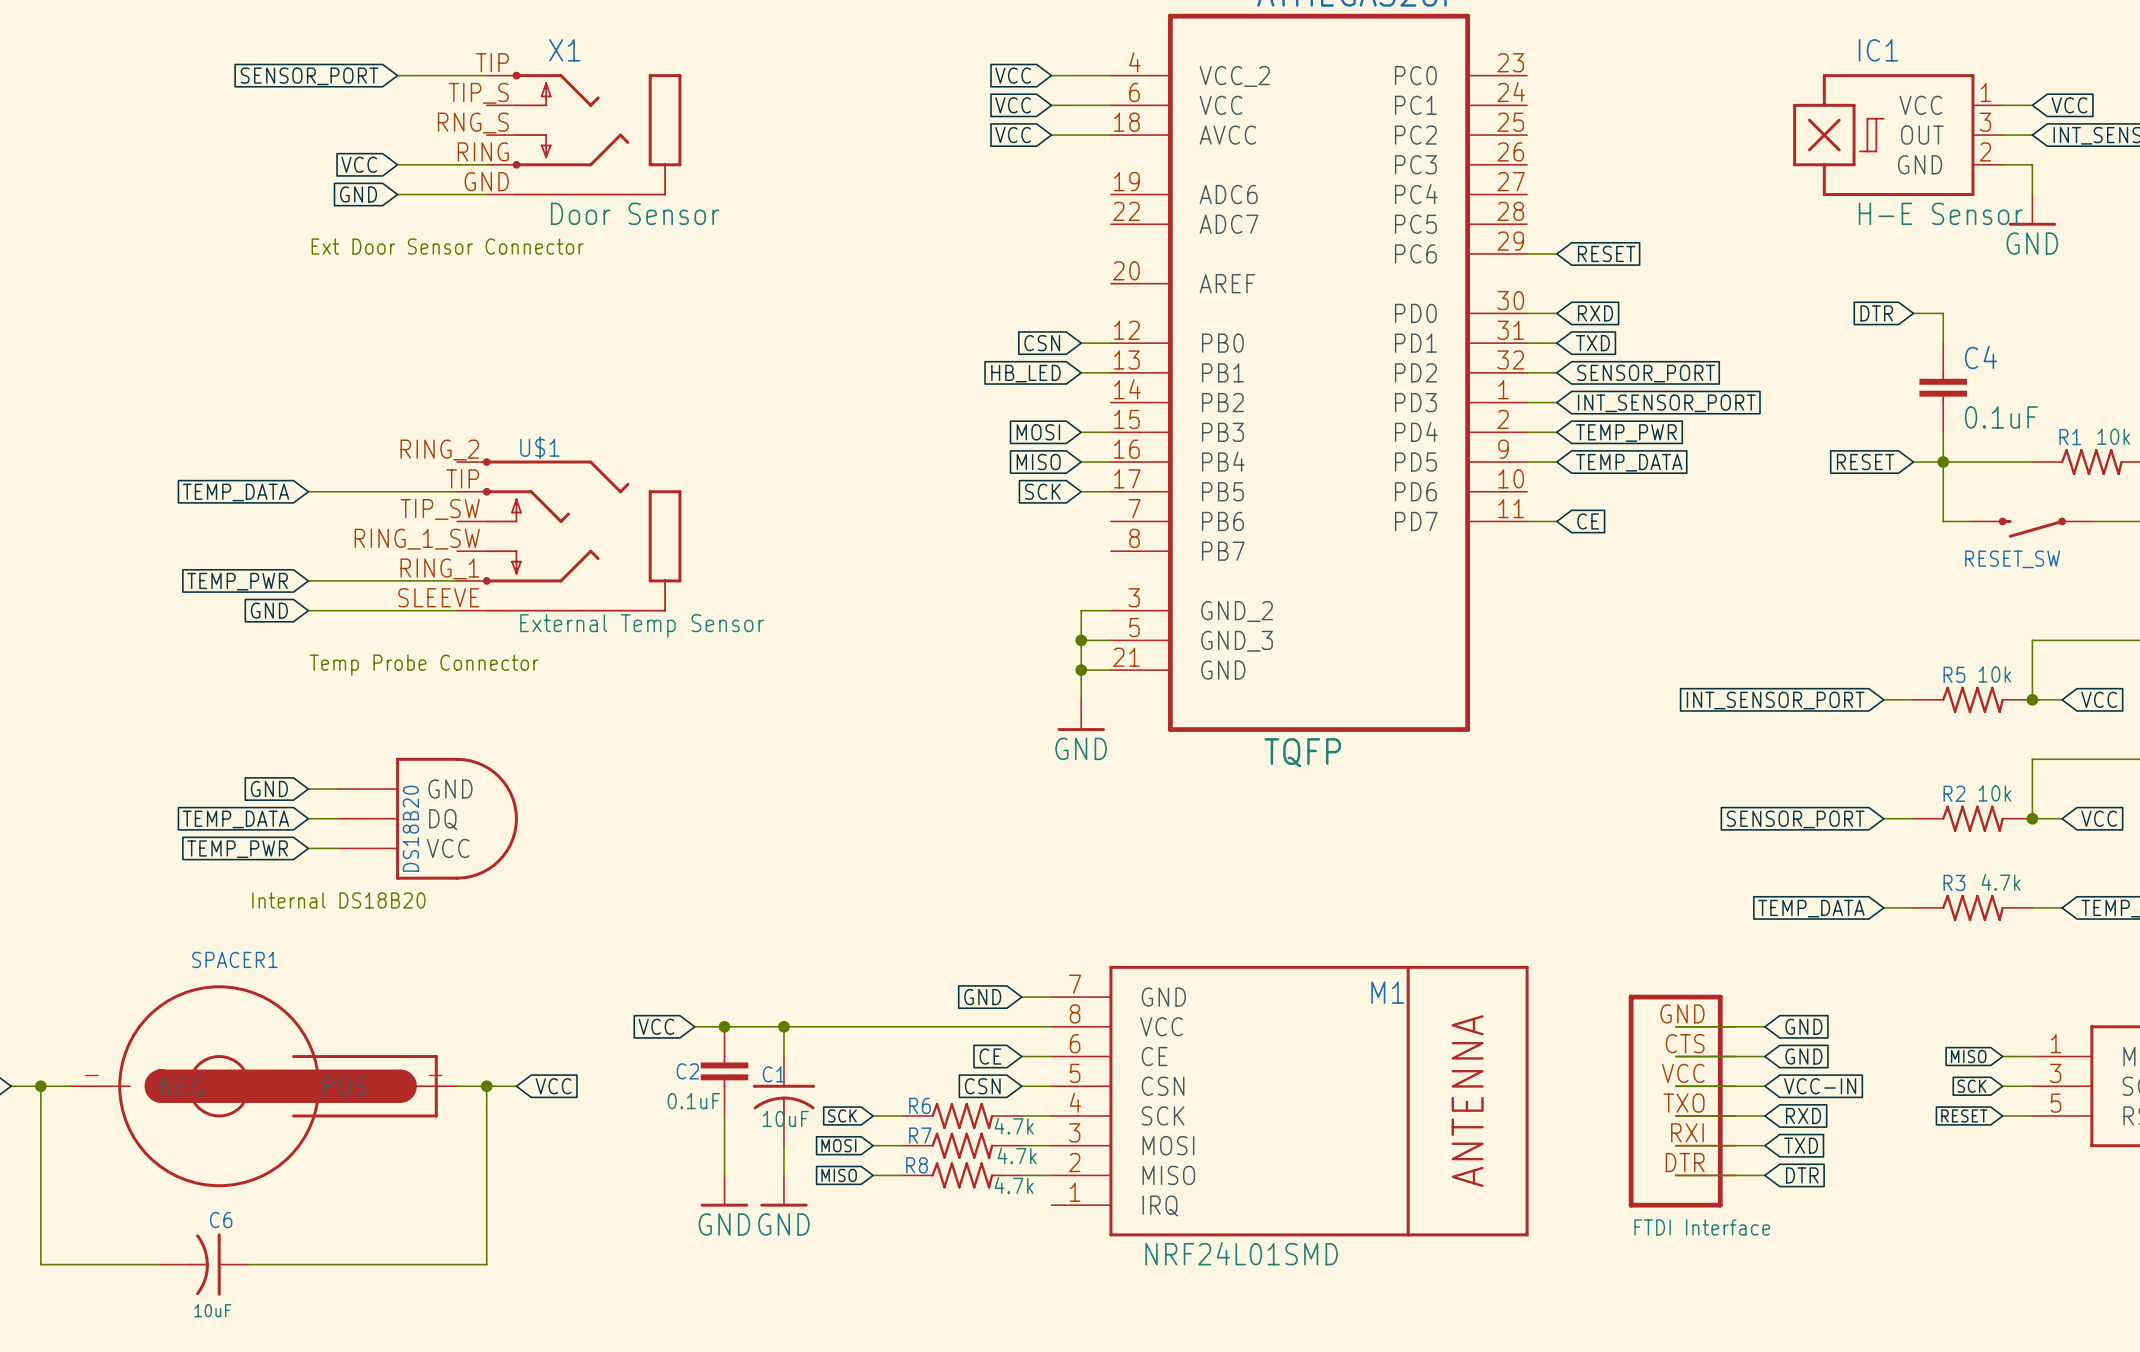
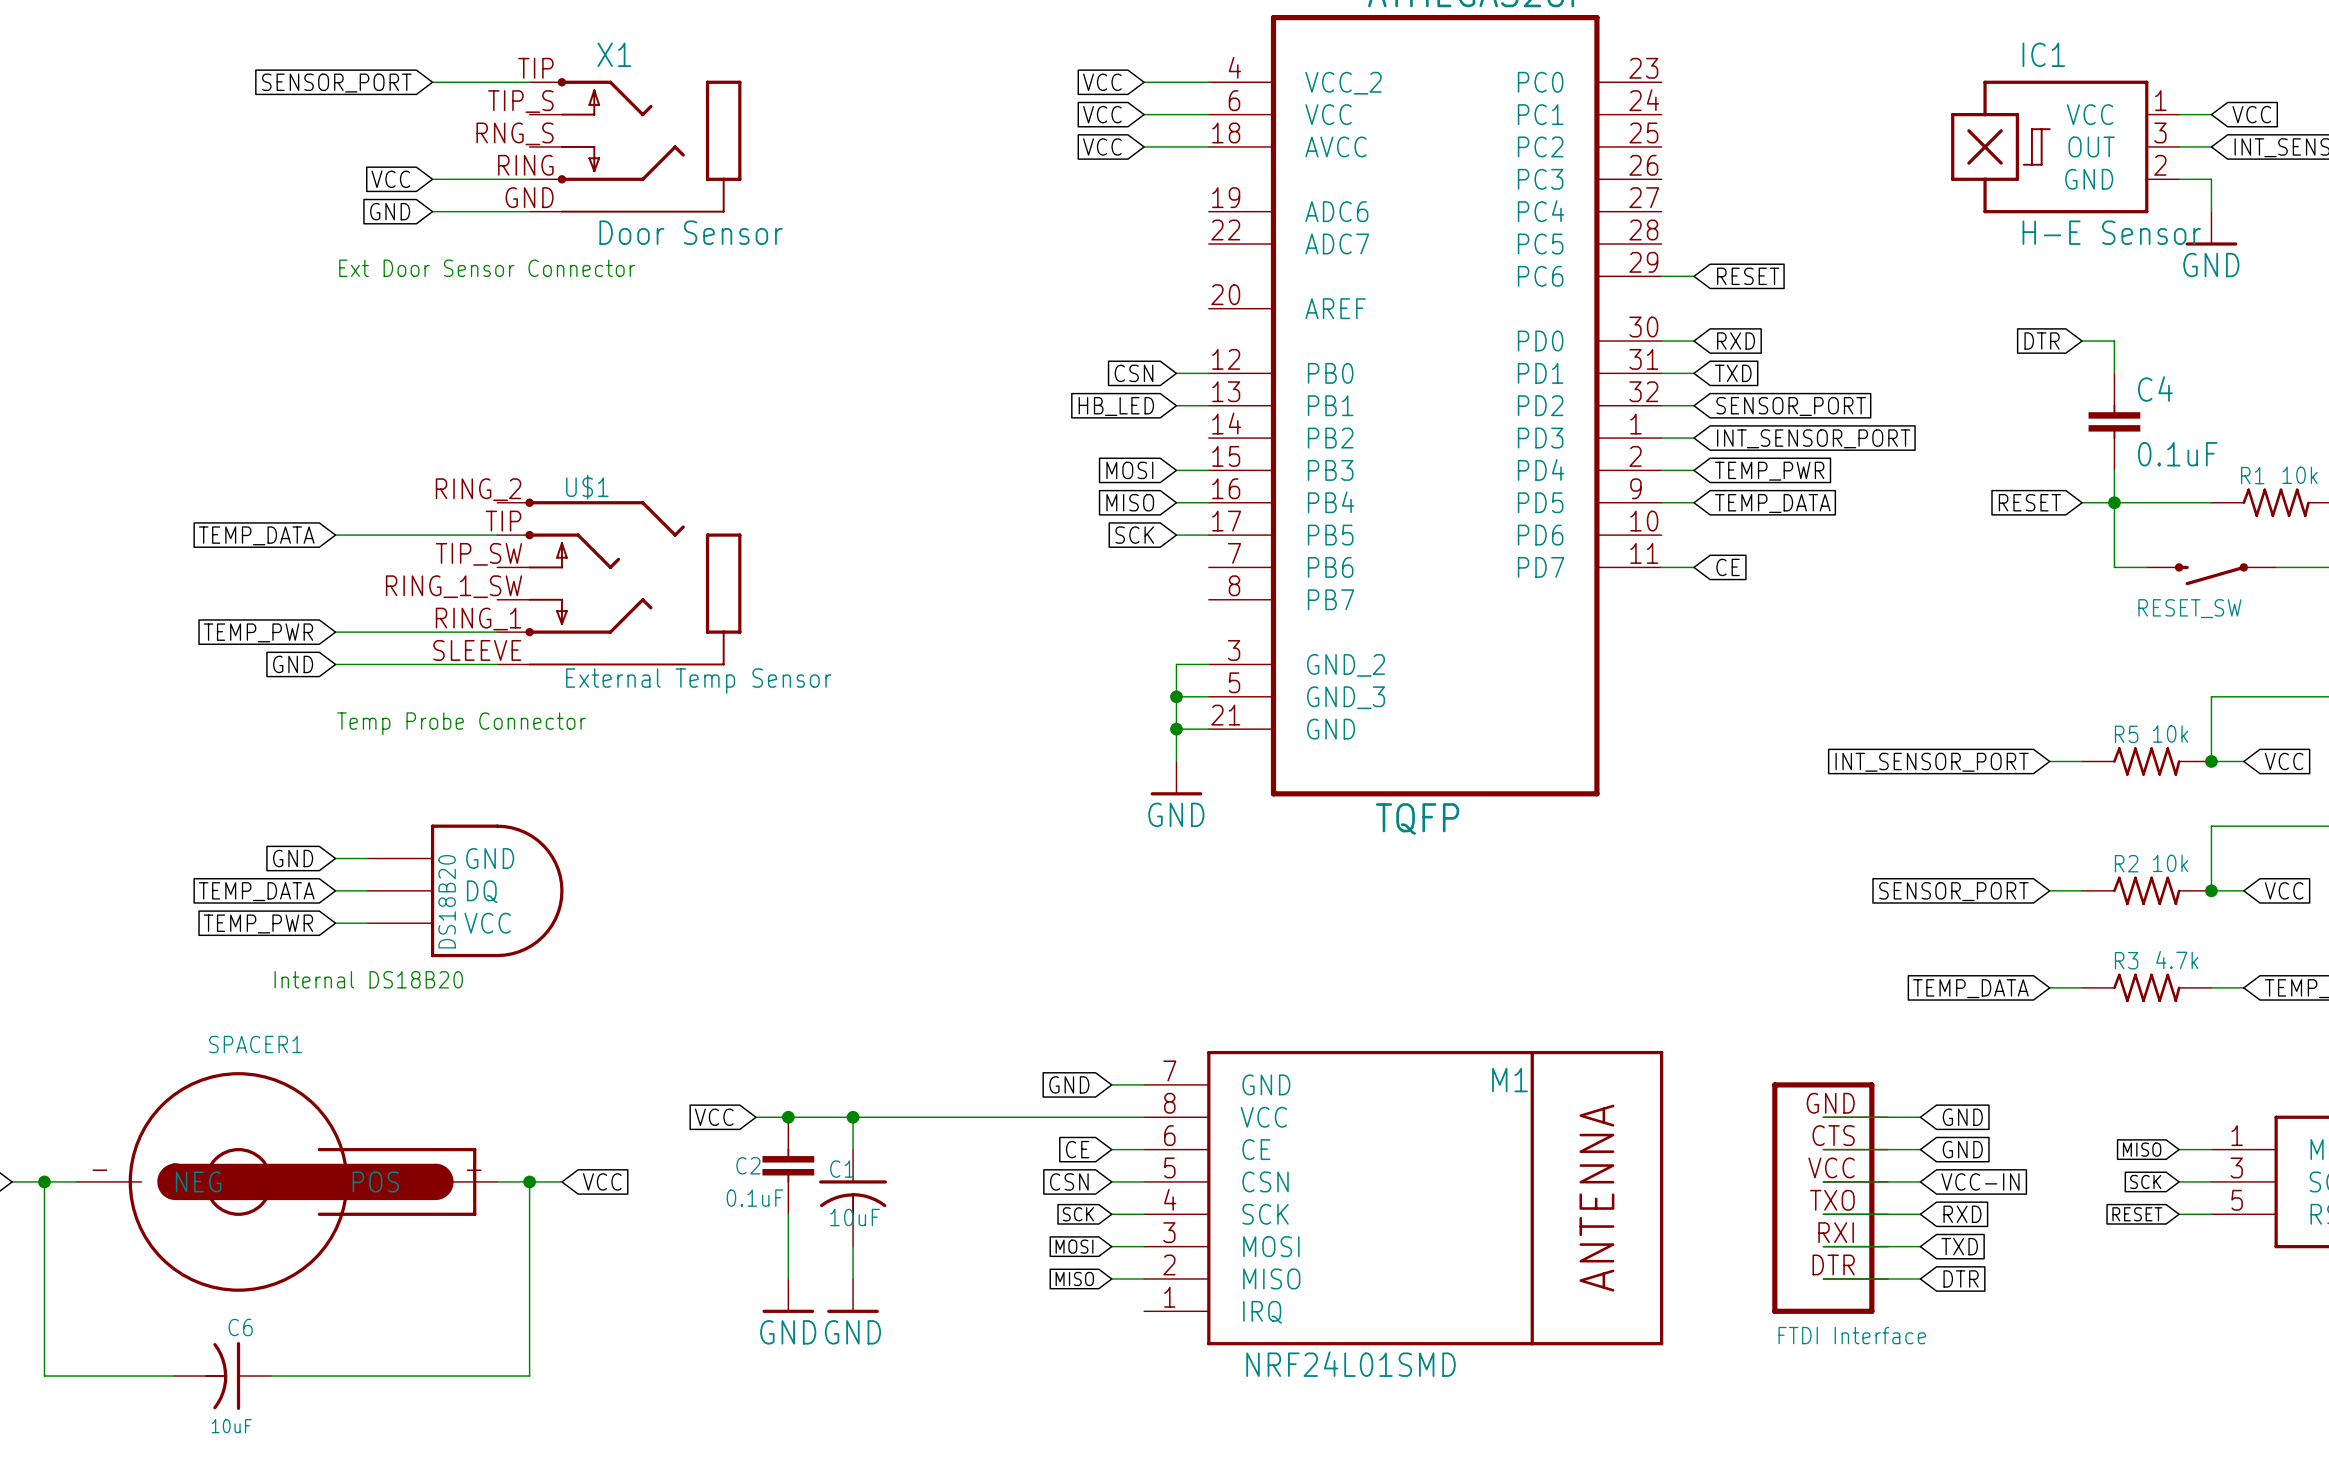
global label position: SCK (842, 1115) -> SCK (1078, 1214)
wire: (873, 1115) (902, 1115) -> none
R6: 4.7k (962, 1115) -> none
global label position: MOSI (838, 1145) -> MOSI (1074, 1246)
wire: (873, 1145) (902, 1145) -> none
R7: 4.7k (962, 1145) -> none
global label position: MISO (839, 1175) -> MISO (1074, 1278)
wire: (873, 1175) (902, 1175) -> none
R8: 4.7k (962, 1175) -> none

